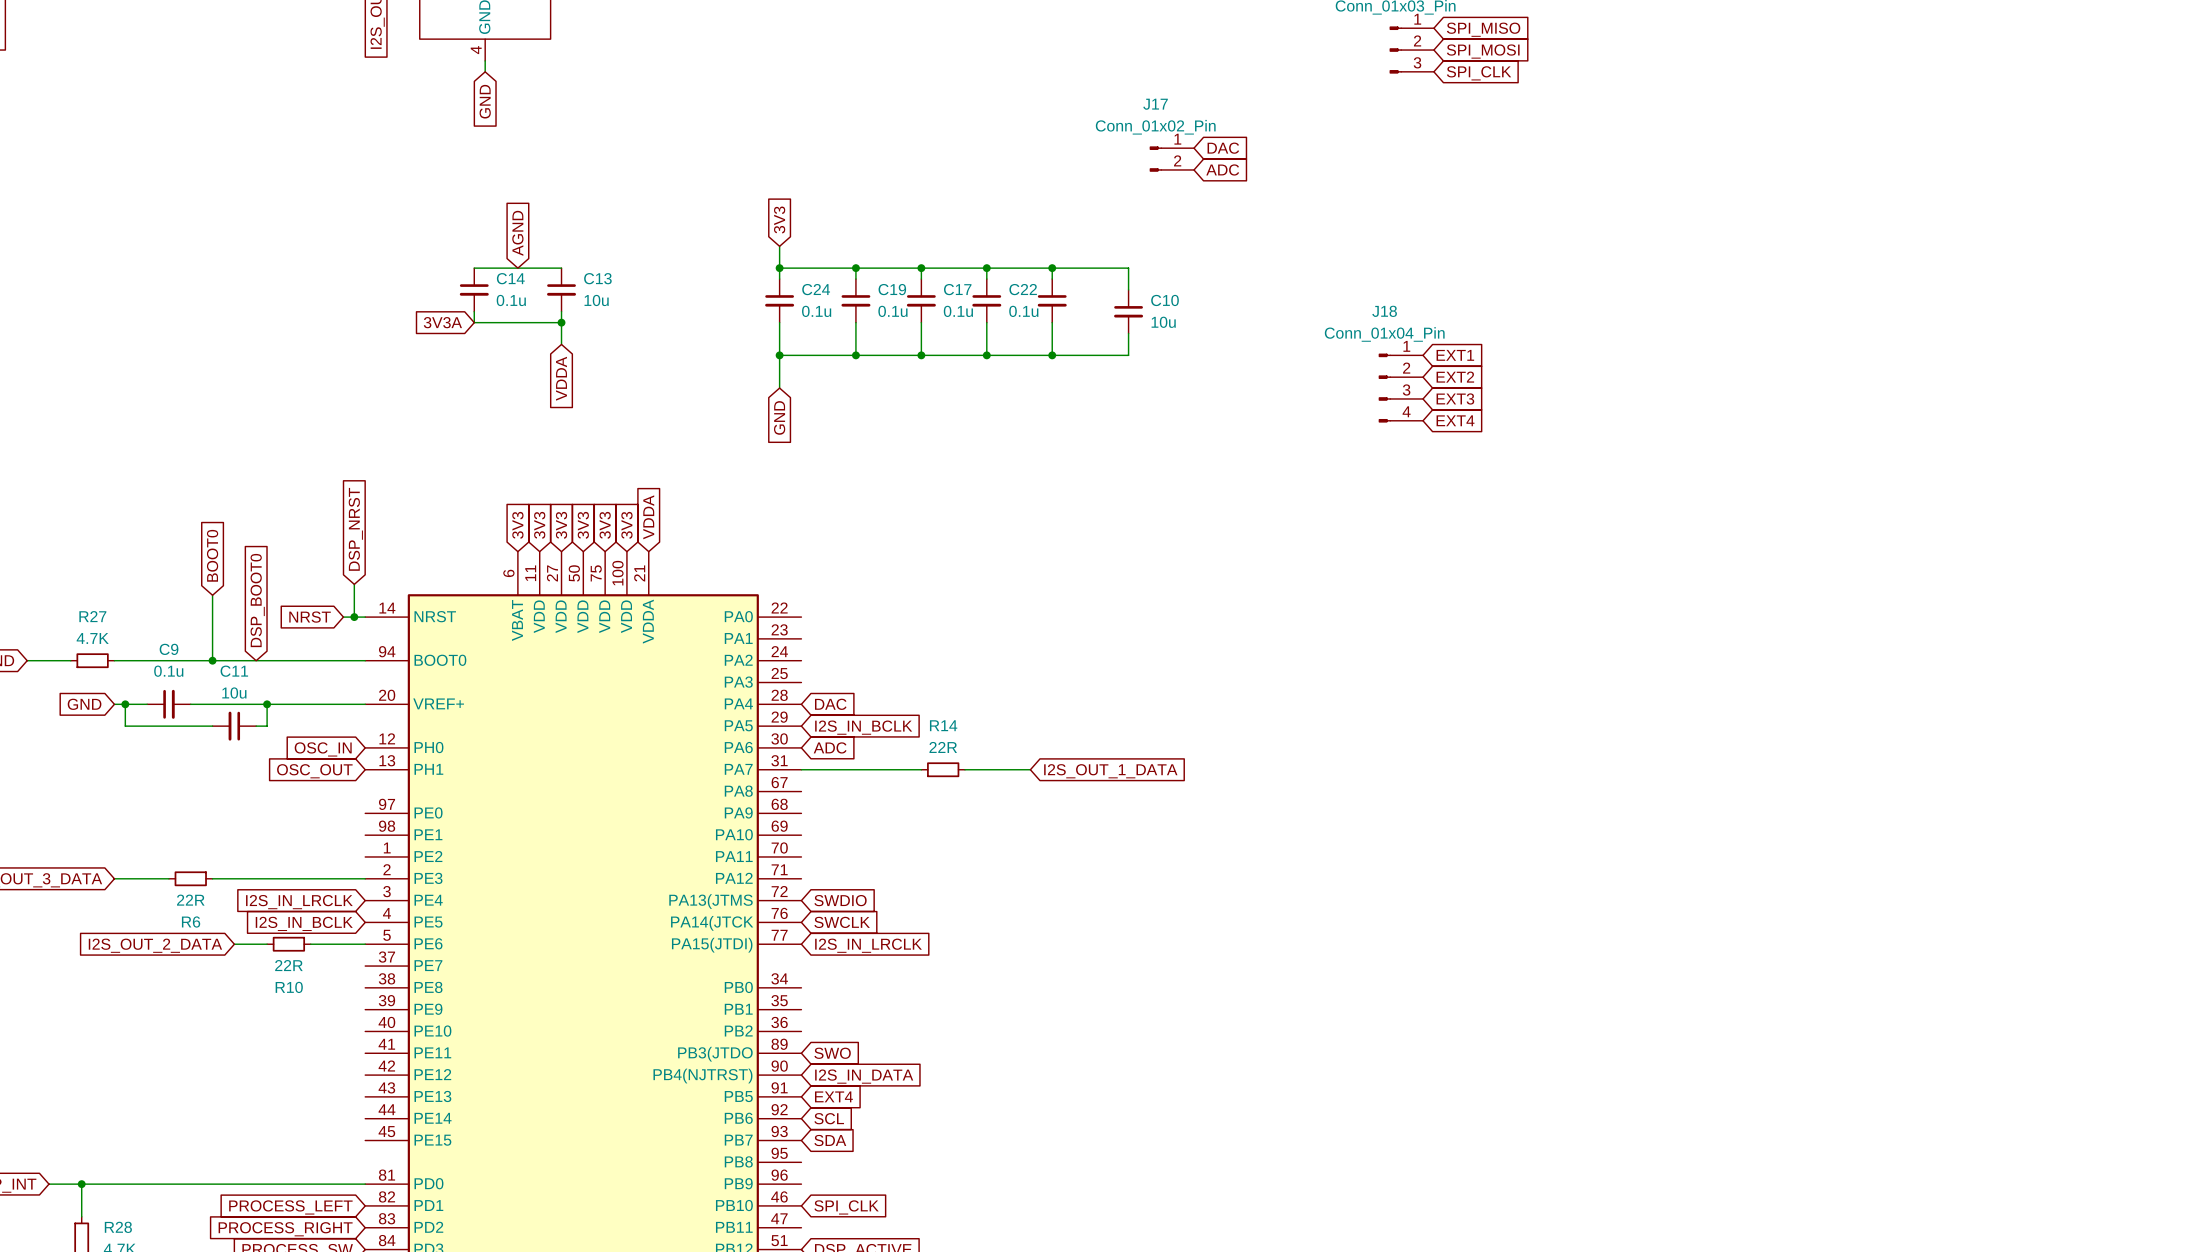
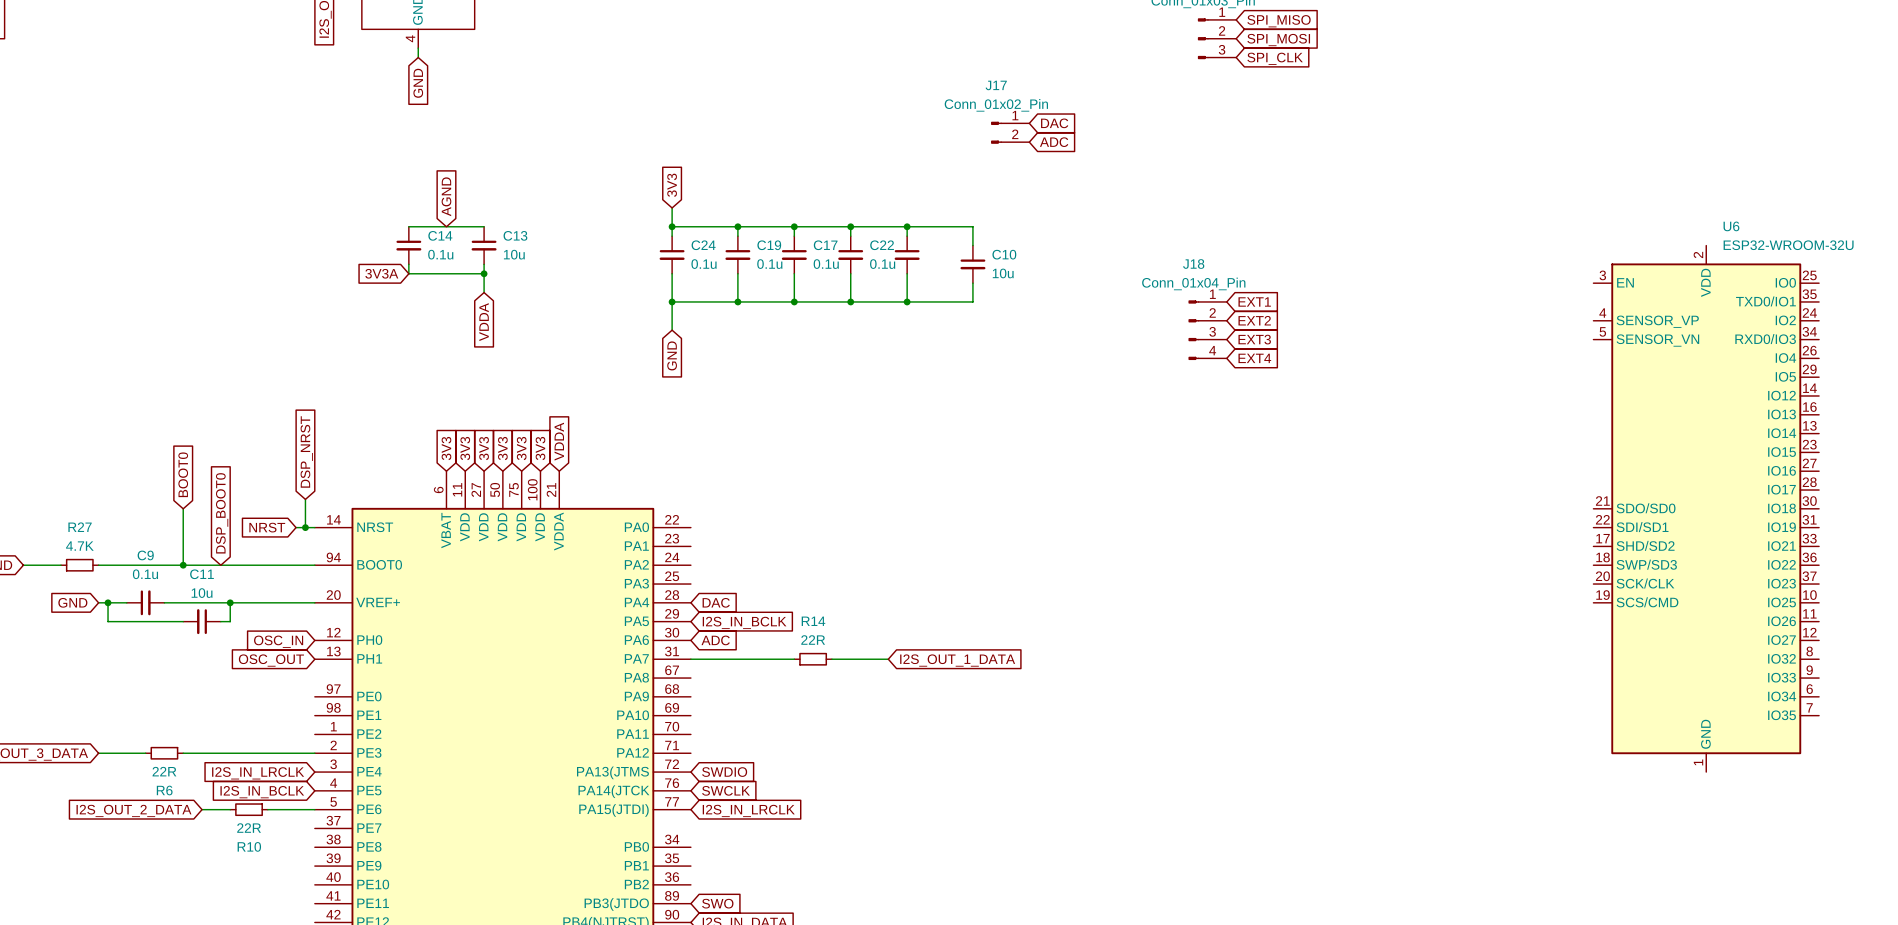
U6: none -> ESP32-WROOM-32U (1706, 508)

